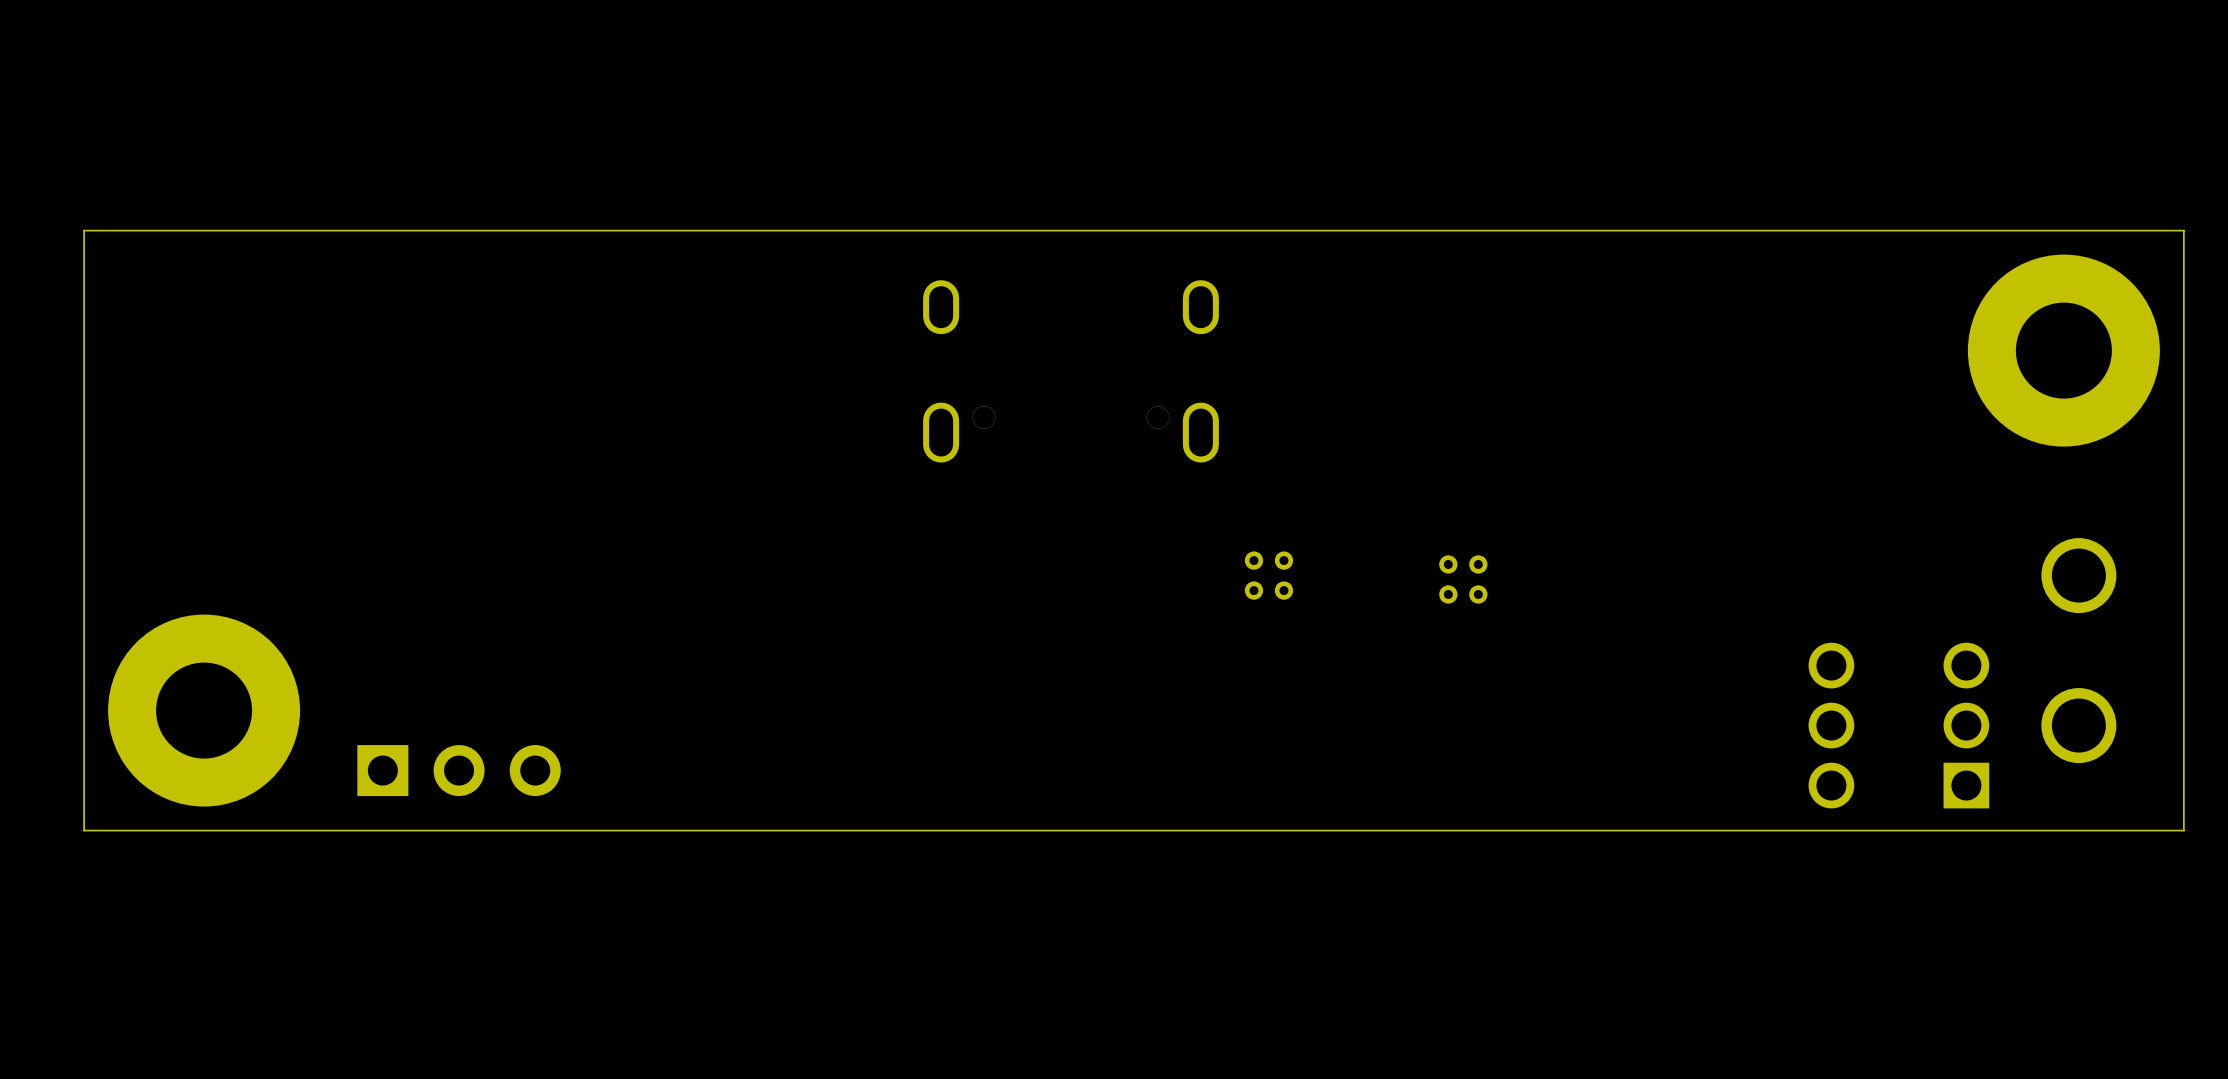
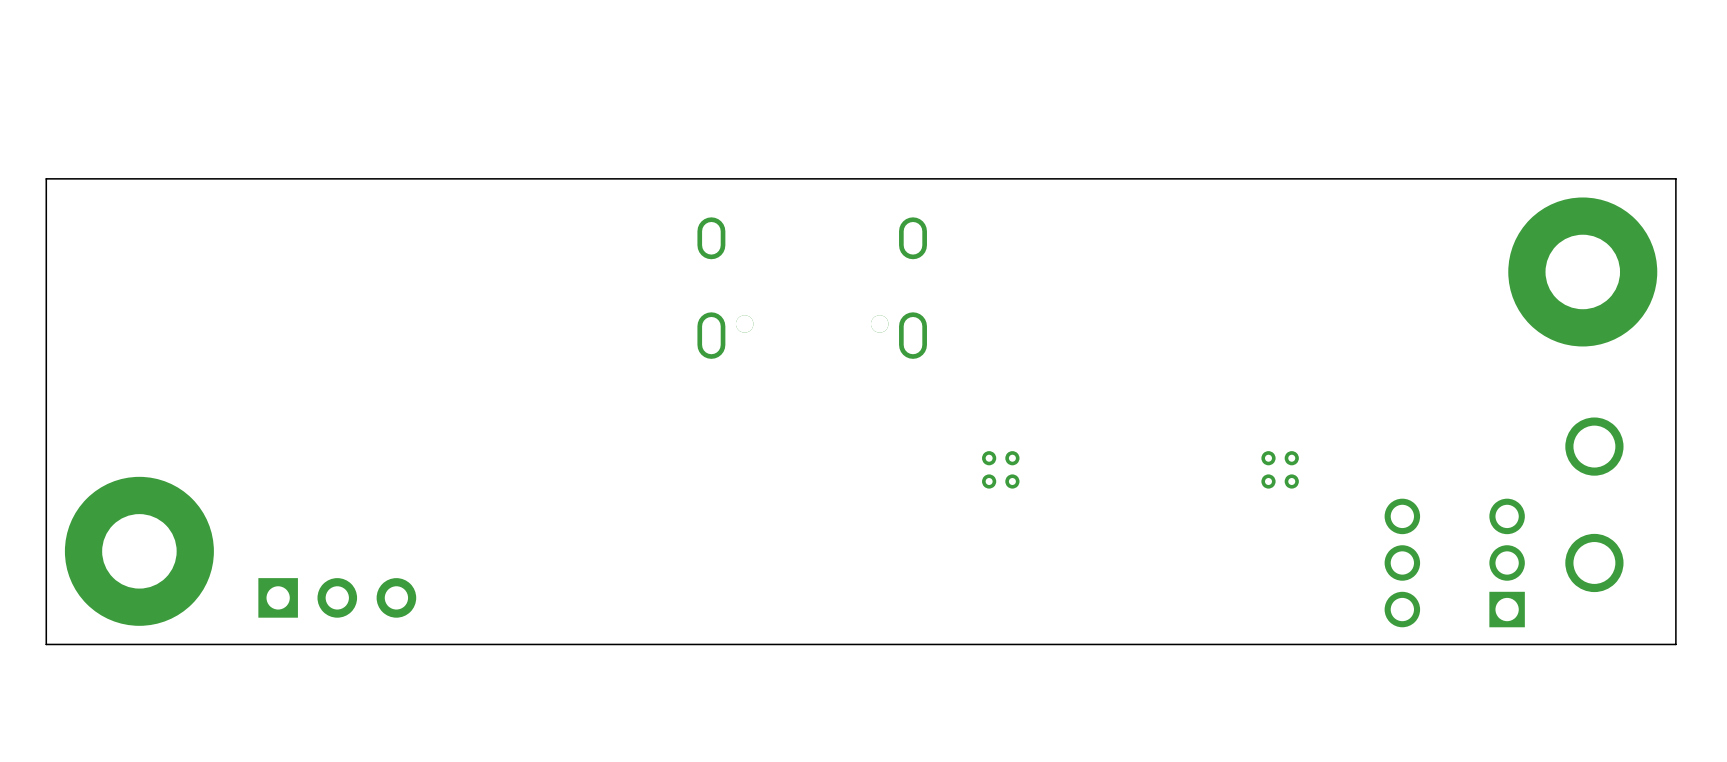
part position: (1268, 575) -> (1000, 469)
part: (1463, 579) -> none
part: none -> (1280, 469)

